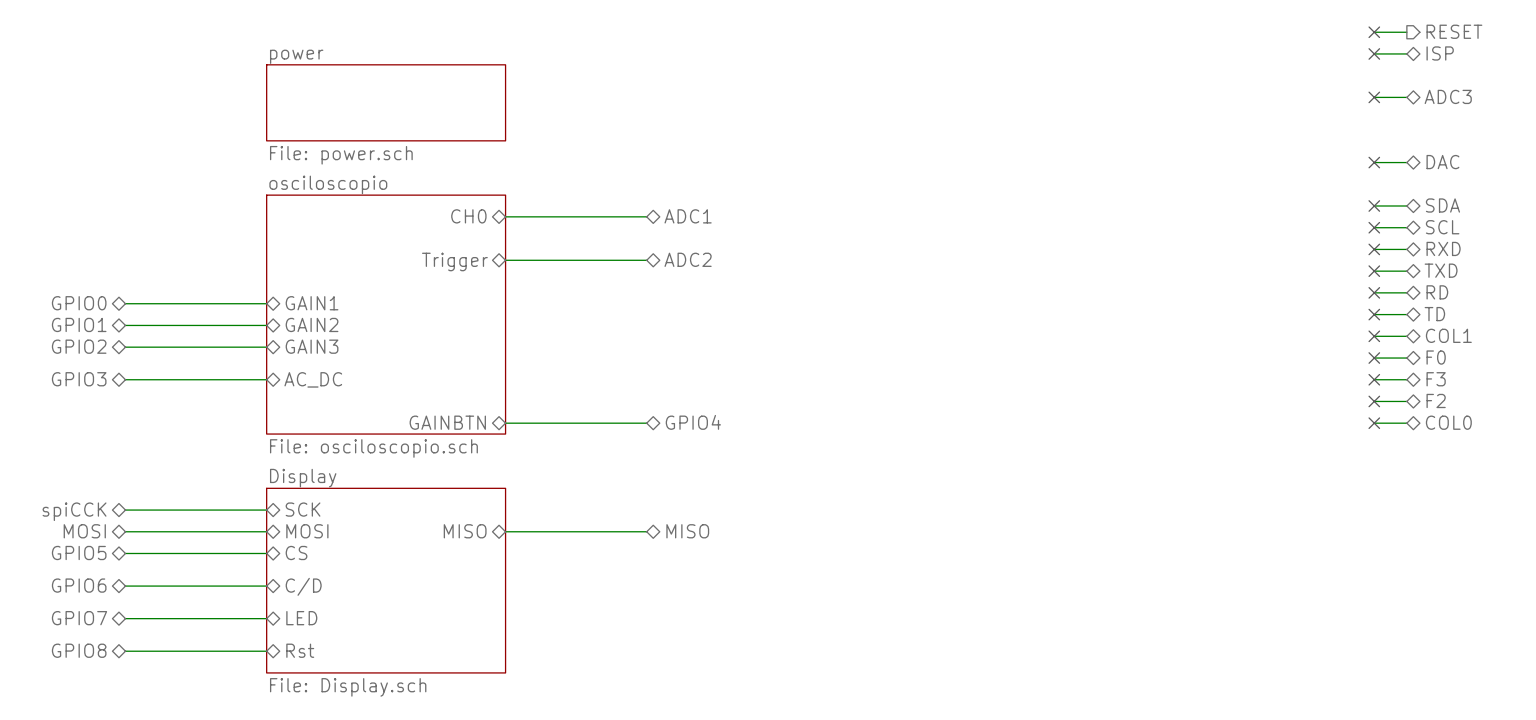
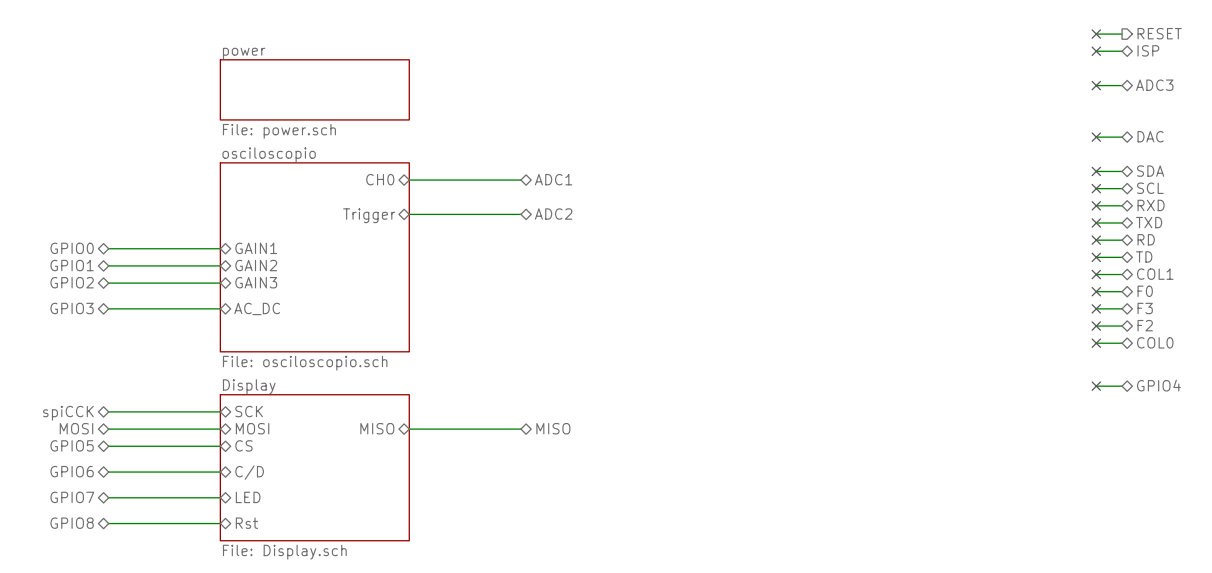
sheet pin: GAINBTN (447, 422) -> none
hierarchical label: GPIO4 (693, 422) -> none
wire: (505, 423) (646, 423) -> none
hierarchical label: none -> GPIO4 (1158, 385)
wire: none -> (1096, 386) (1122, 386)
no-connect mark: none -> (1096, 386)

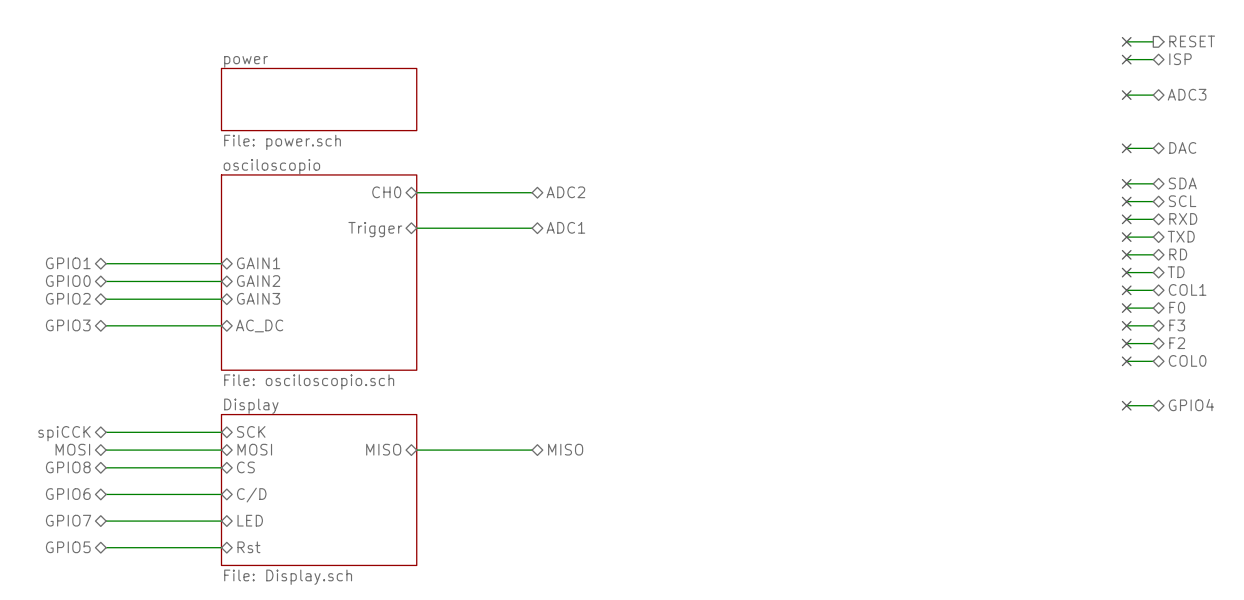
hierarchical label: ADC1 (553, 179) -> ADC2 (565, 192)
hierarchical label: ADC2 (553, 214) -> ADC1 (565, 227)
hierarchical label: GPIO0 (72, 248) -> GPIO1 (68, 263)
hierarchical label: GPIO1 (72, 265) -> GPIO0 (68, 281)
hierarchical label: GPIO5 (72, 445) -> GPIO8 (68, 467)
hierarchical label: GPIO8 (72, 523) -> GPIO5 (68, 547)

